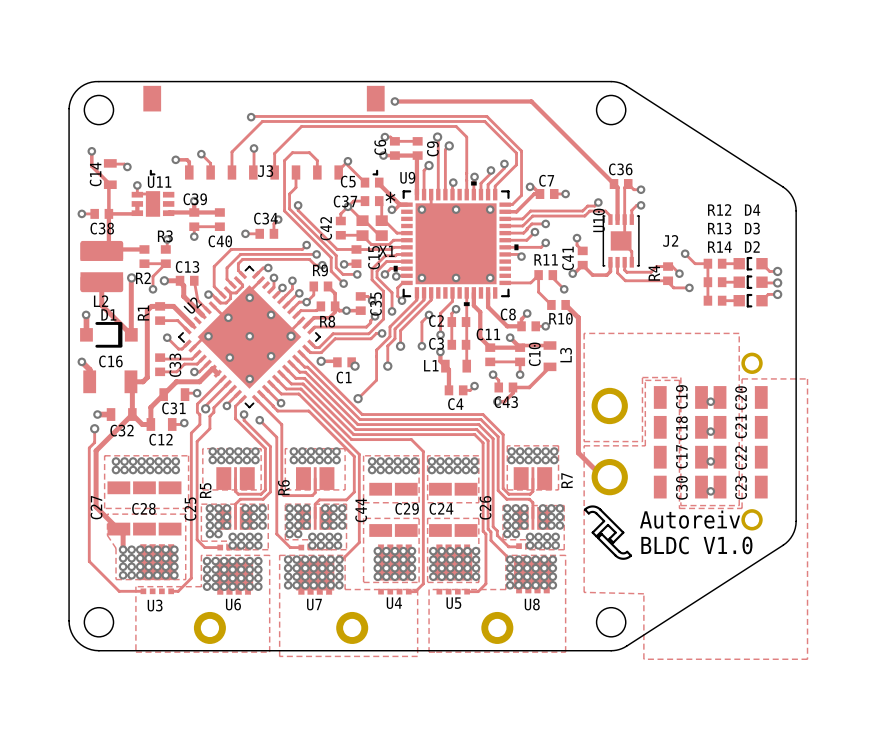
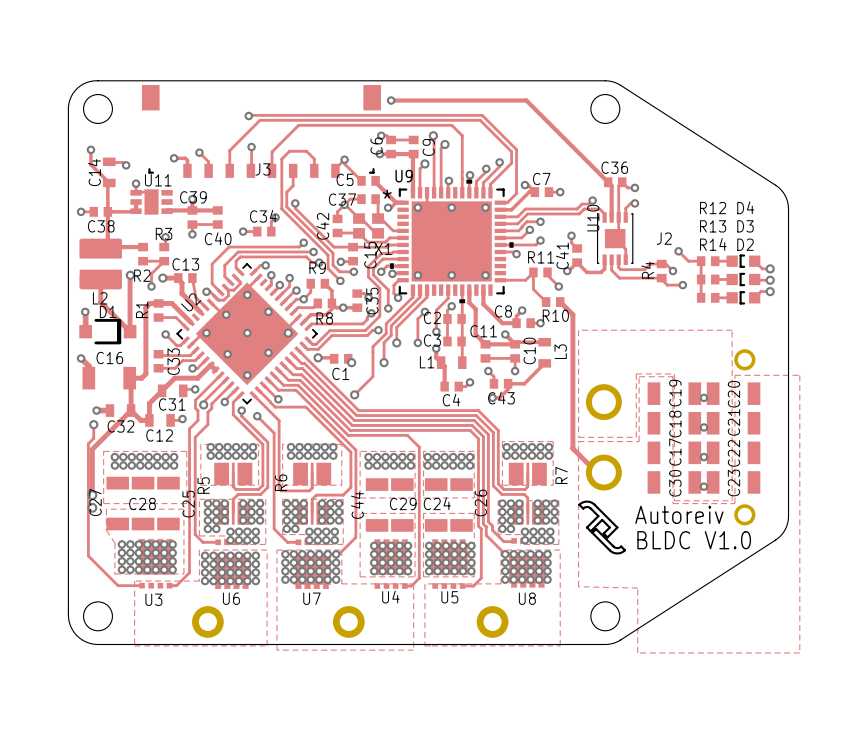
track: (96, 450) (96, 507) (123, 534) (123, 549) -> (95, 446) (92, 449) (92, 495)
via: none -> (92, 495)
via: none -> (92, 507)

